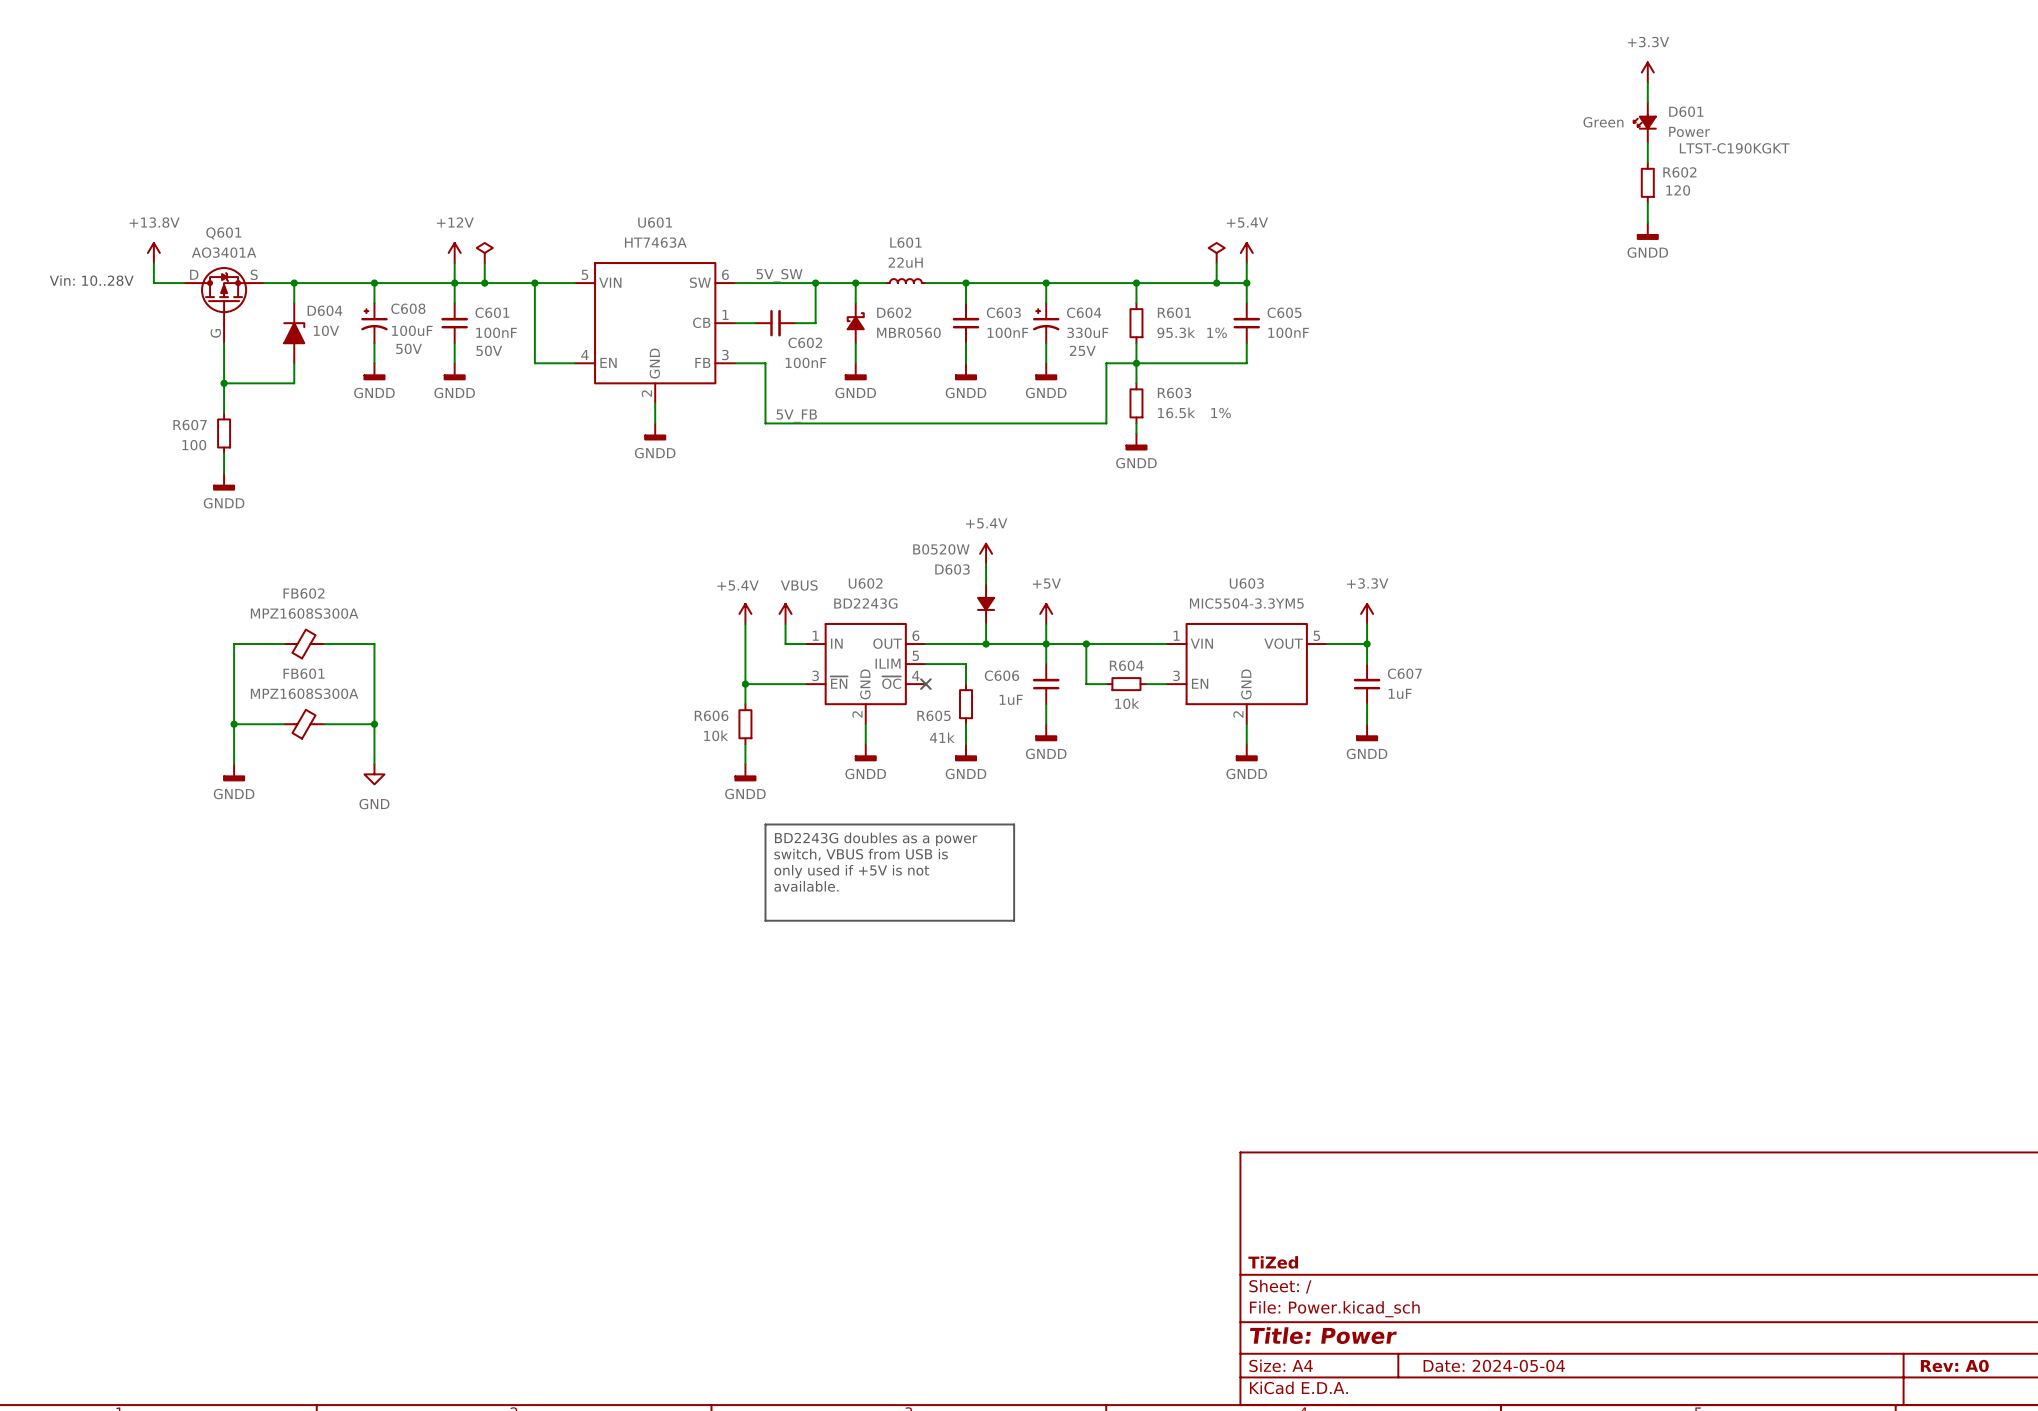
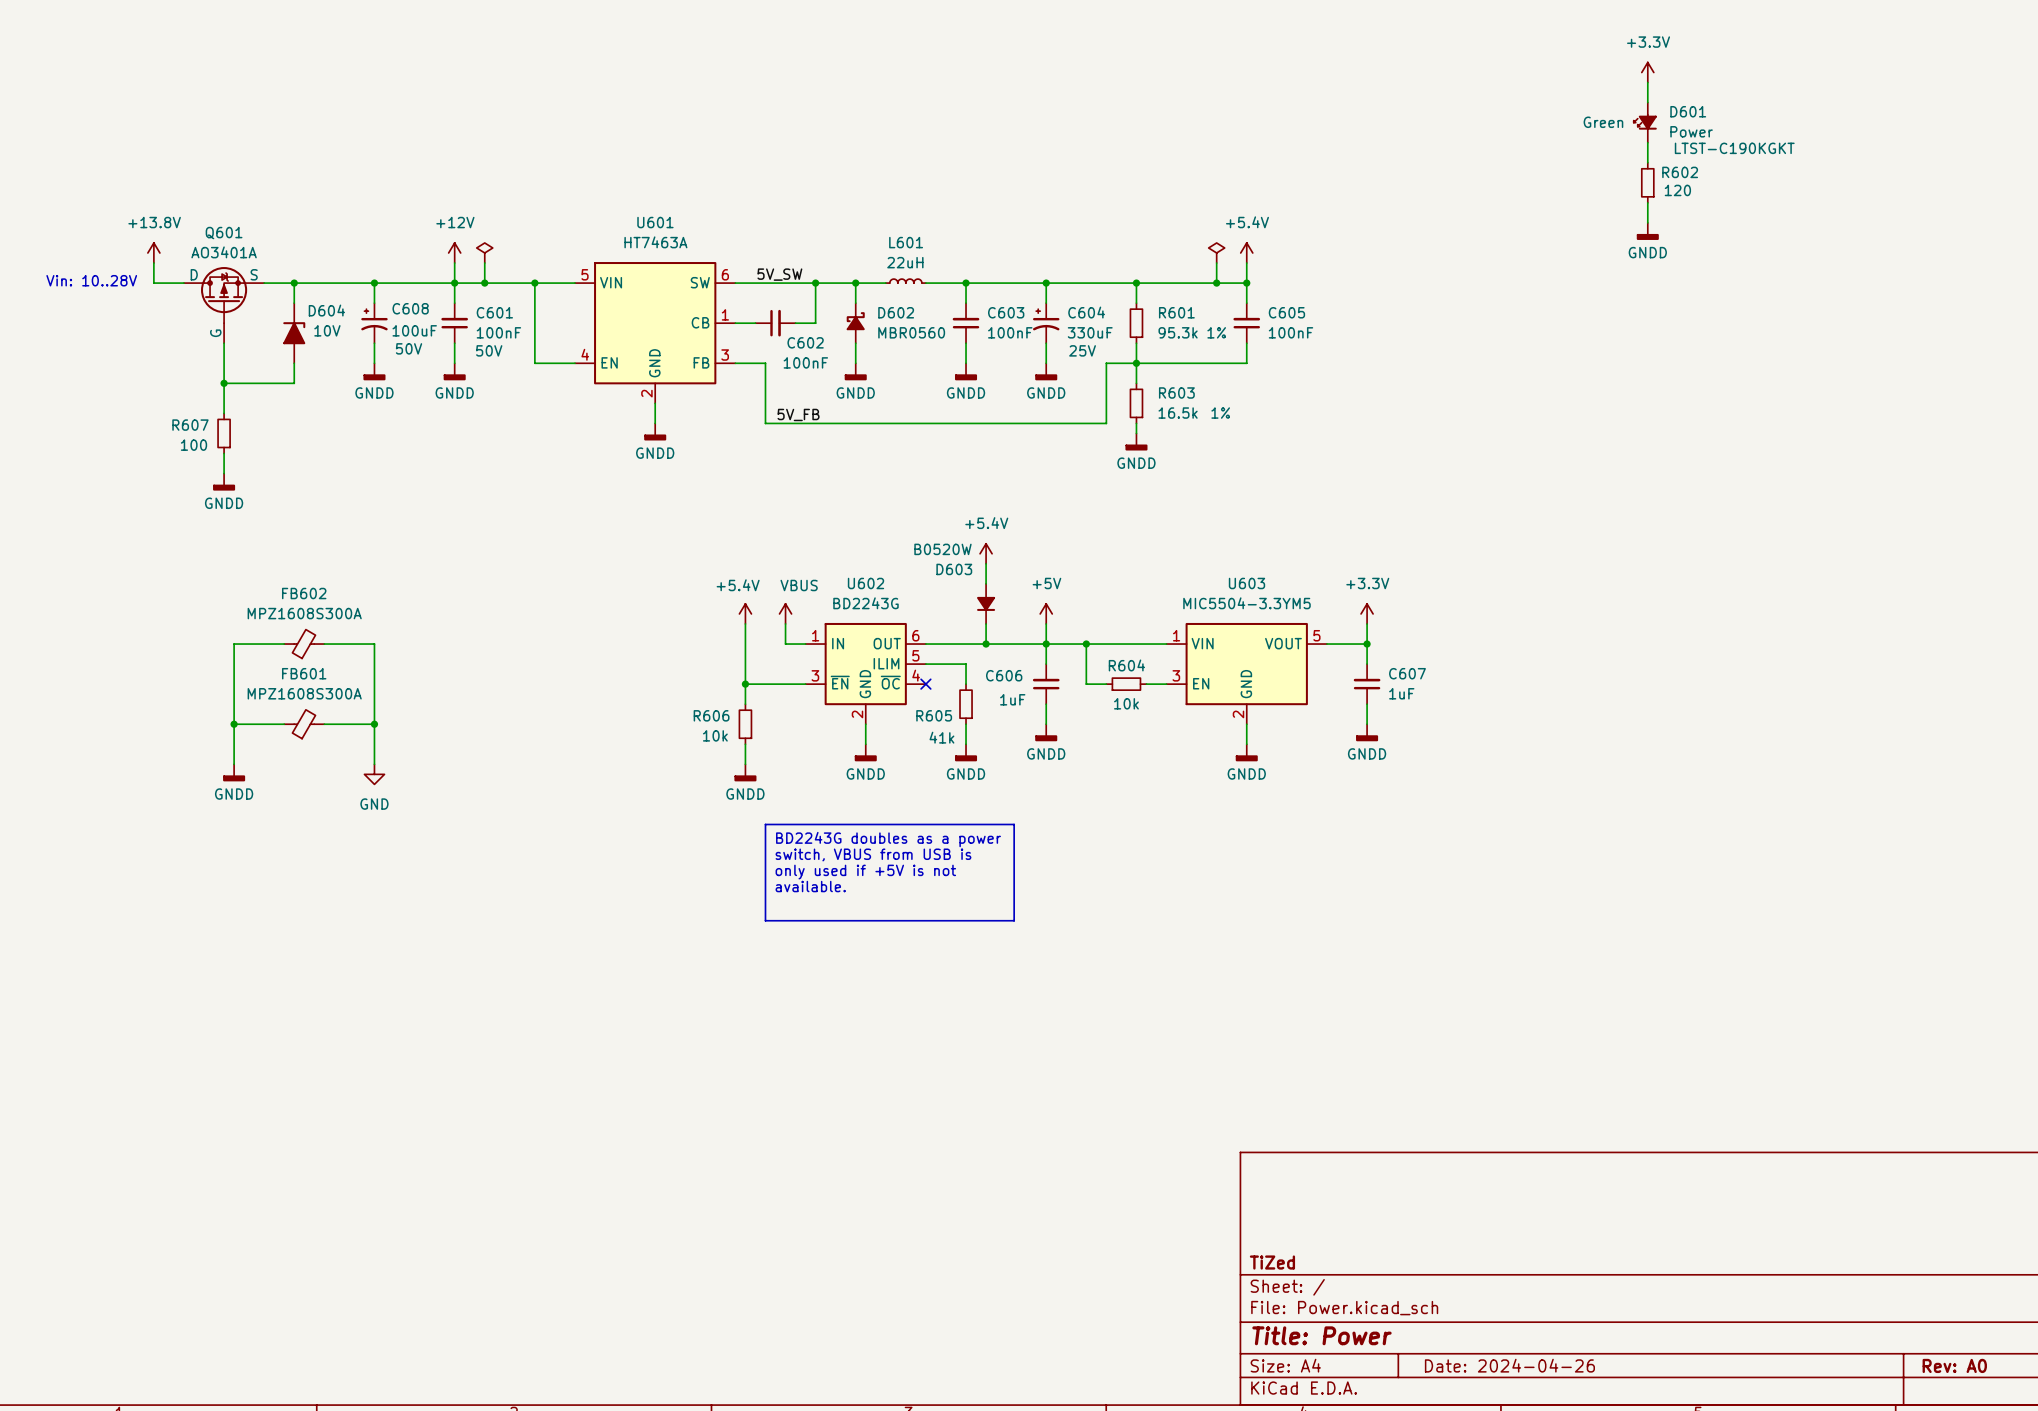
title block: Date: 2024-05-04 (1494, 1365) -> Date: 2024-04-26 (1509, 1365)

